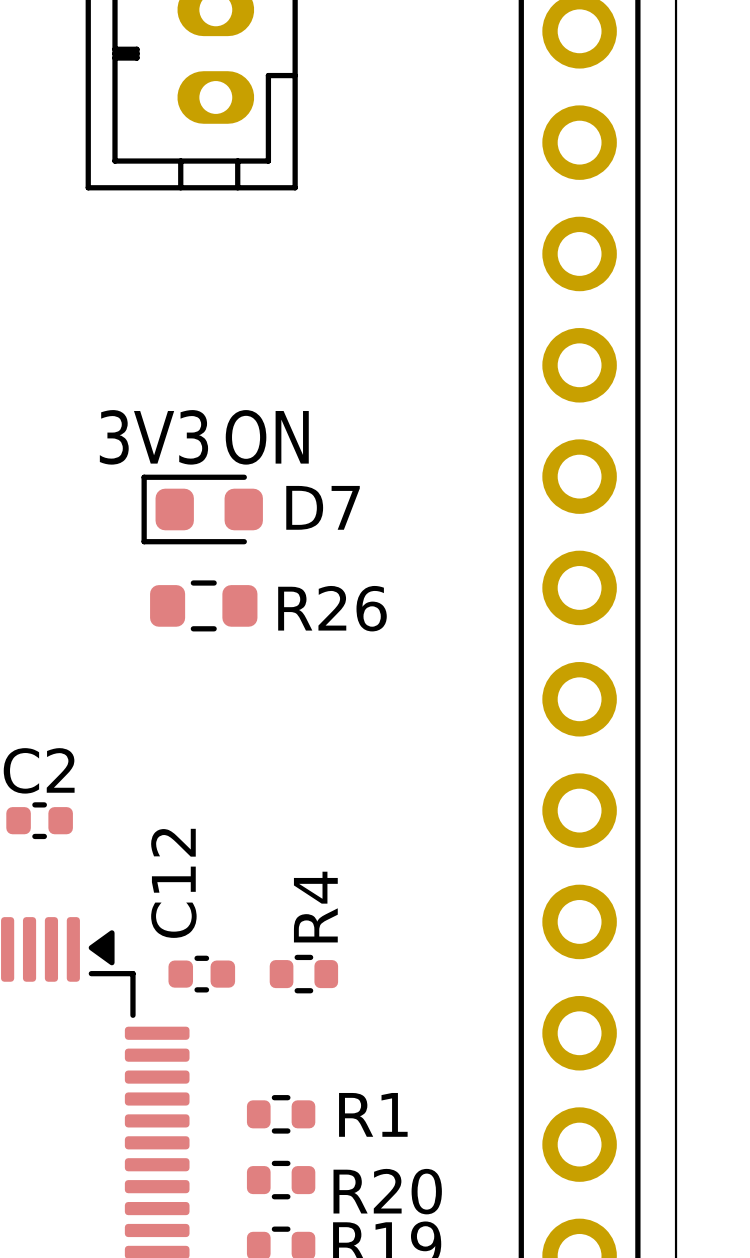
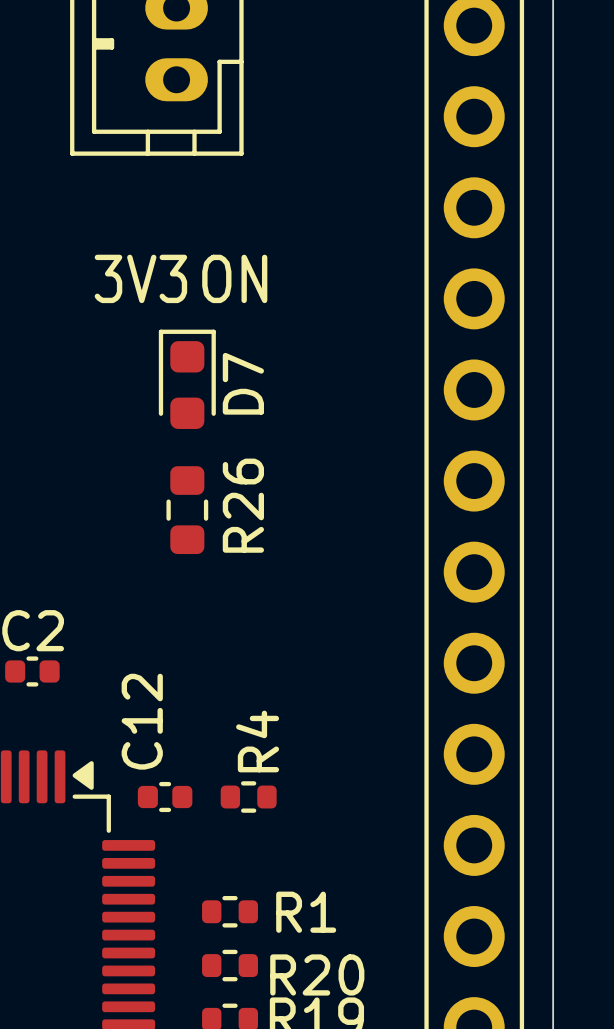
text position: 3V3 (153, 437) -> 3V3 (140, 278)
text position: ON (267, 437) -> ON (234, 278)
D7 rotation: 0° (202, 509) -> 90° clockwise (187, 379)
R26 rotation: 0° (203, 605) -> 90° clockwise (187, 510)

